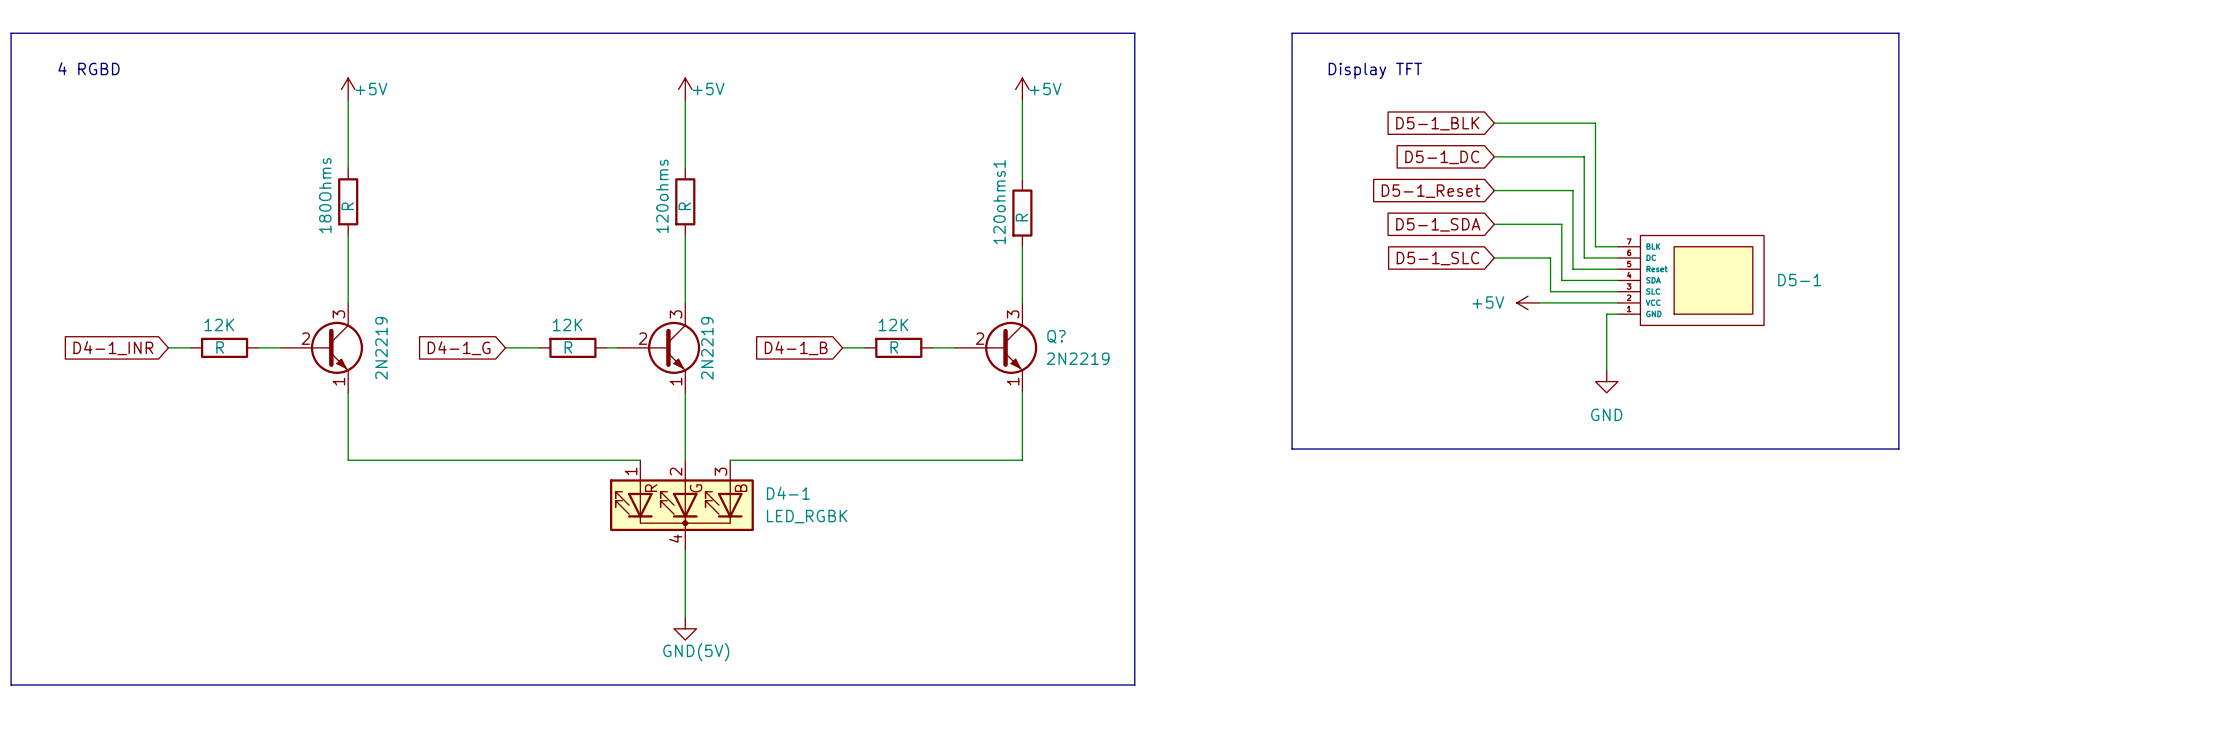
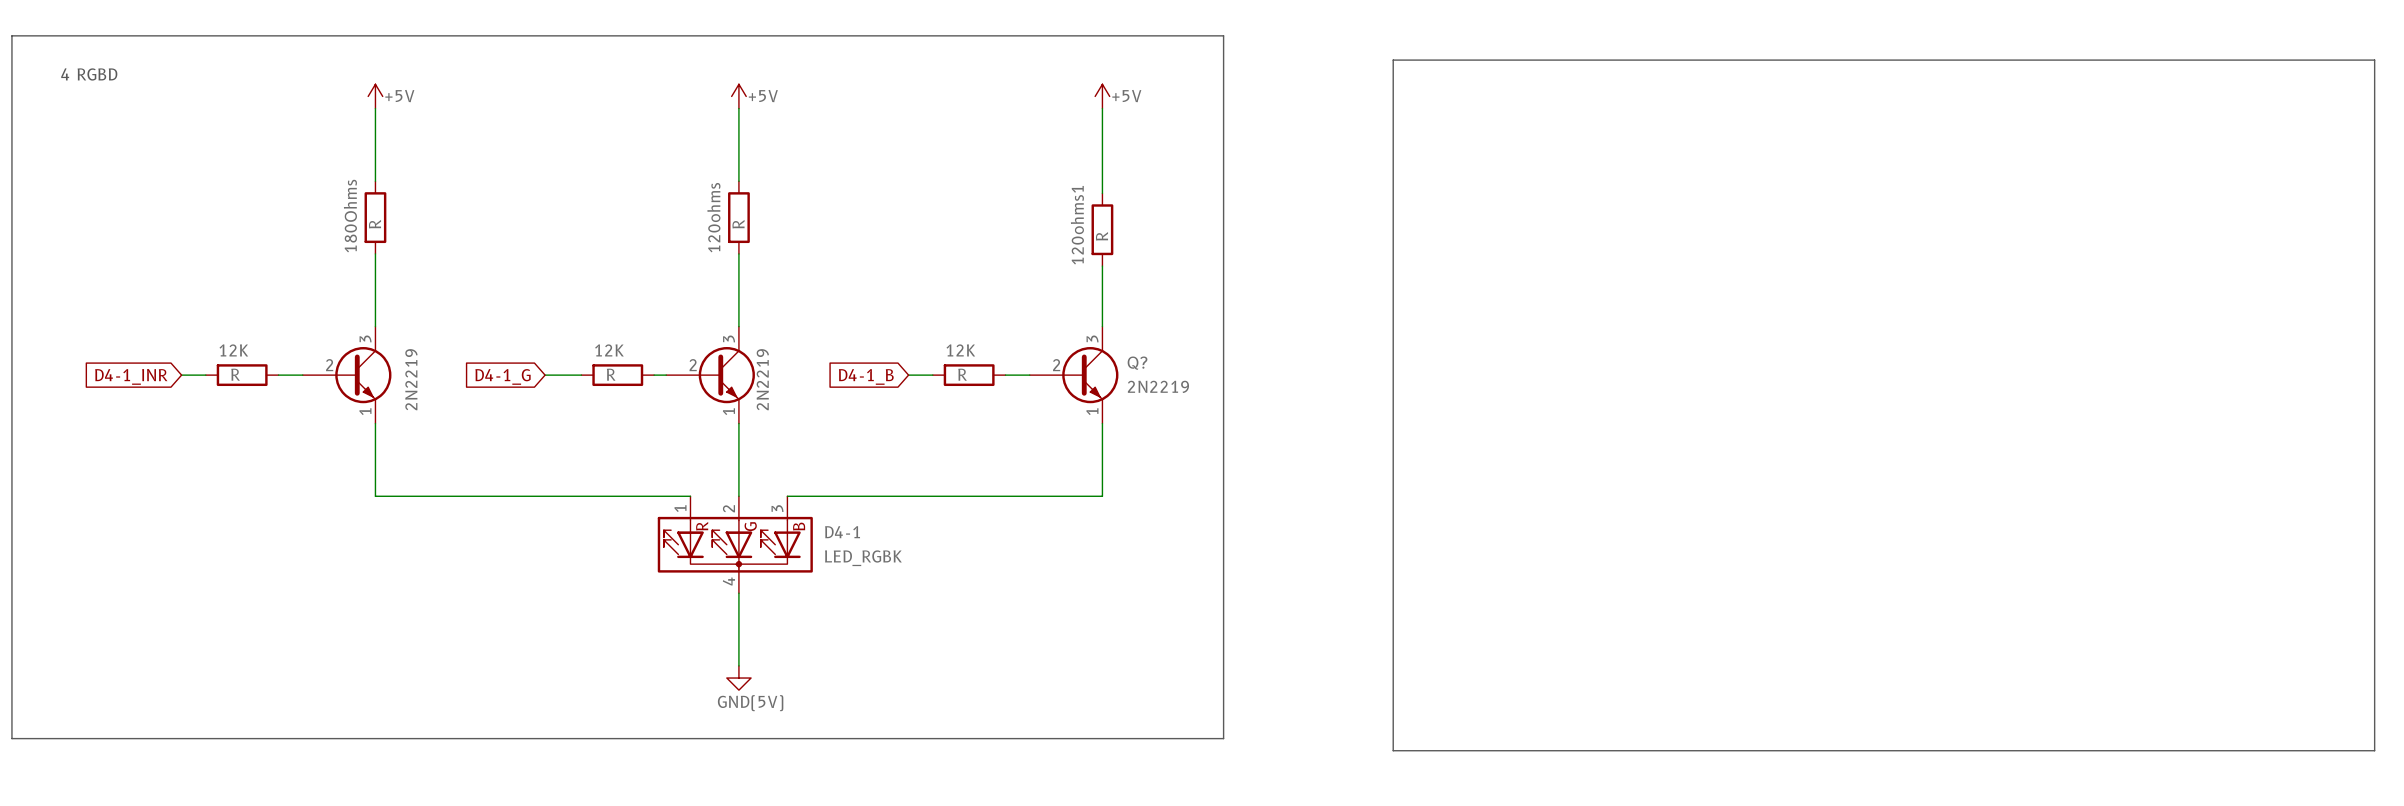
line: (1292, 55) (1292, 33) (1898, 33) (1898, 449) (1292, 449) -> (1393, 60) (2374, 60) (2374, 750) (1393, 750) (1393, 484)
text: Display TFT (1375, 70) -> none
global label: D5-1_BLK (1437, 123) -> none
wire: (1494, 123) (1595, 123) (1595, 246) (1617, 246) -> none
wire: (1494, 156) (1584, 156) (1584, 257) (1617, 257) -> none
global label: D5-1_DC (1442, 157) -> none
wire: (1494, 190) (1573, 190) (1573, 269) (1617, 269) -> none
global label: D5-1_Reset (1431, 191) -> none
global label: D5-1_SDA (1438, 224) -> none
wire: (1494, 224) (1561, 224) (1561, 280) (1617, 280) -> none
wire: (1494, 257) (1550, 257) (1550, 291) (1617, 291) -> none
global label: D5-1_SLC (1438, 258) -> none
D5-1: (1690, 280) -> none
power symbol: +5V (1528, 302) -> none
wire: (1539, 302) (1617, 302) -> none
wire: (1617, 314) (1606, 314) (1606, 370) -> none
power symbol: GND (1606, 381) -> none

